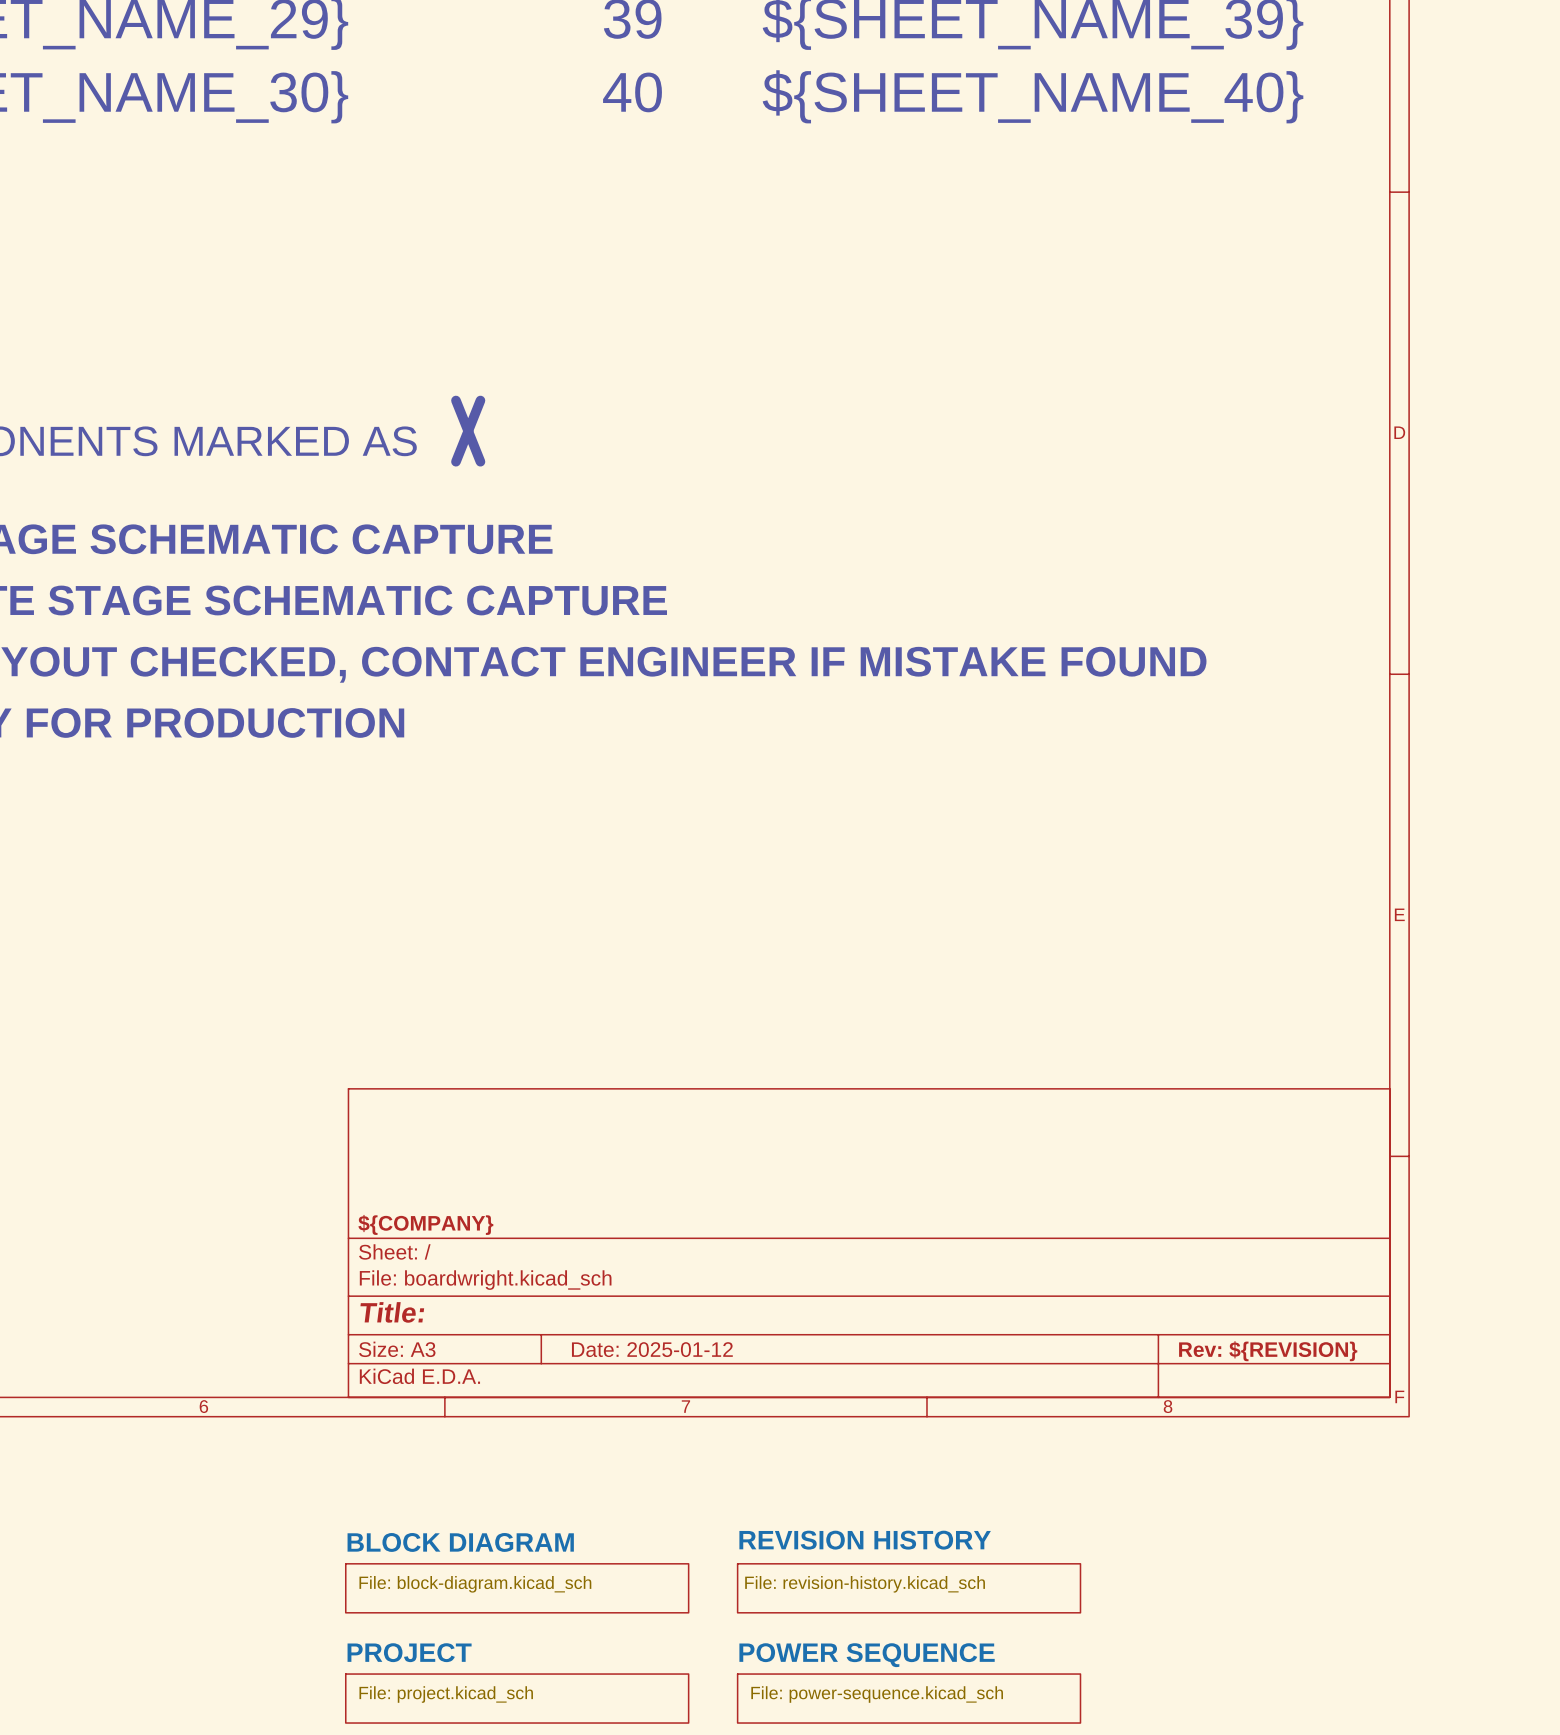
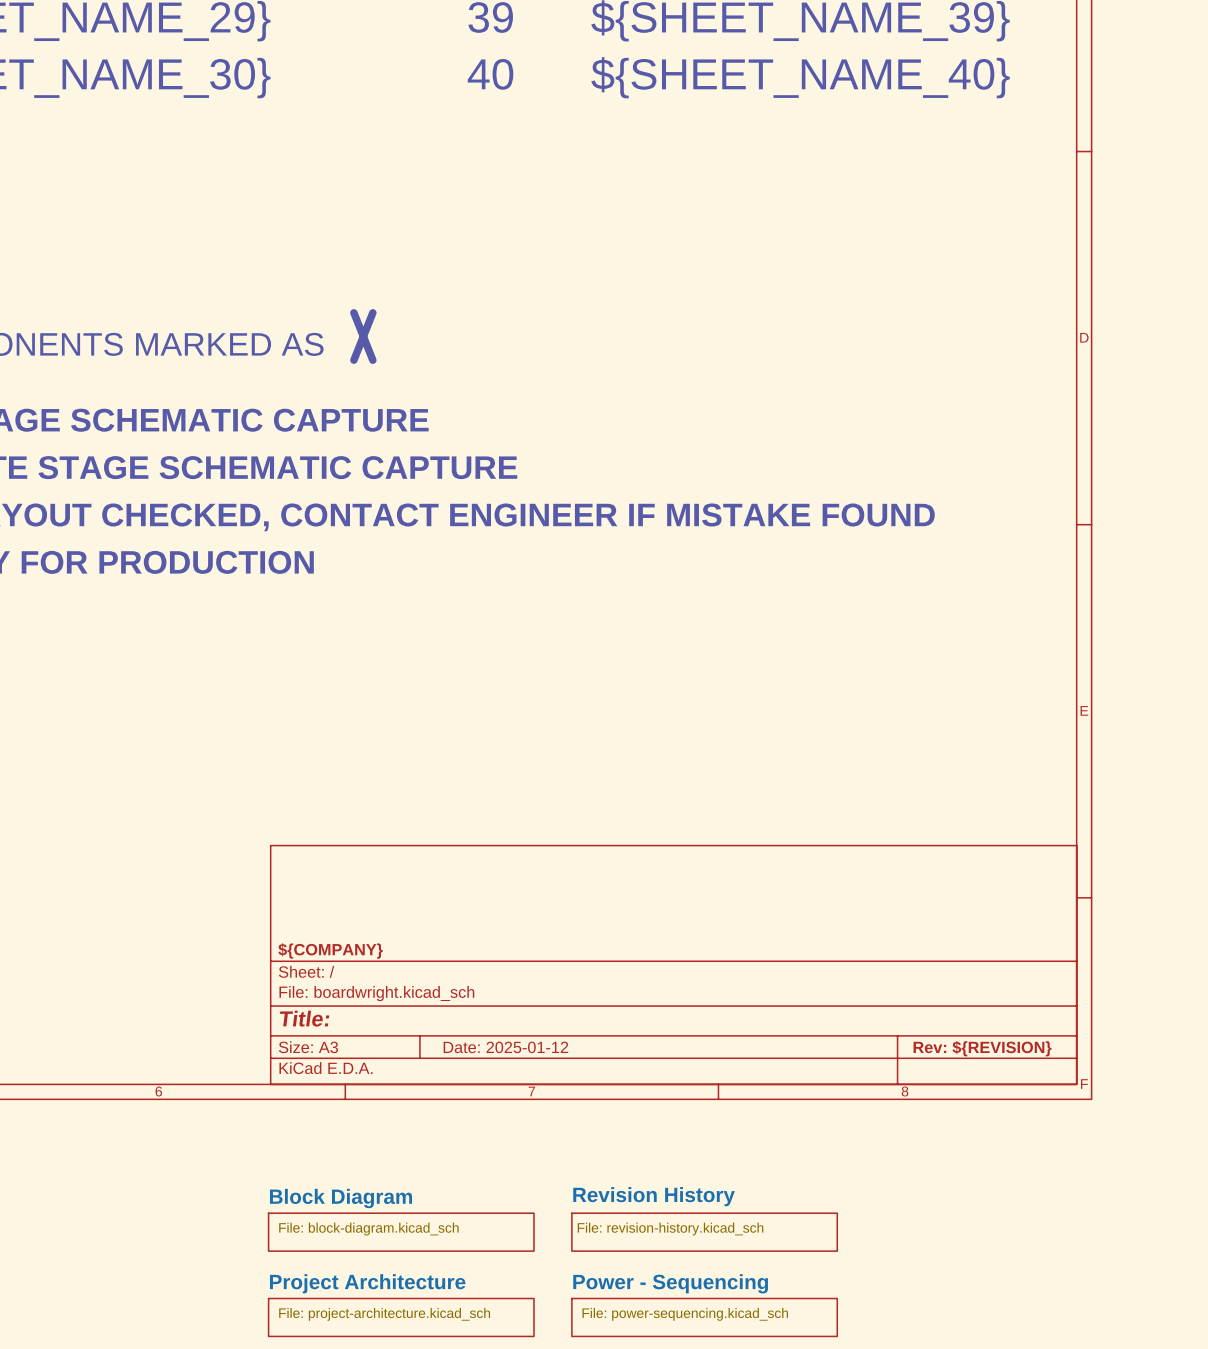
sheet REVISION HISTORY name: REVISION HISTORY (865, 1540) -> Revision History (654, 1196)
sheet BLOCK DIAGRAM name: BLOCK DIAGRAM (460, 1542) -> Block Diagram (340, 1198)
sheet PROJECT name: PROJECT (409, 1652) -> Project Architecture (367, 1283)
sheet POWER SEQUENCE name: POWER SEQUENCE (867, 1655) -> Power - Sequencing (670, 1283)
sheet PROJECT value: File: project.kicad_sch (446, 1694) -> File: project-architecture.kicad_sch (384, 1314)
sheet POWER SEQUENCE value: File: power-sequence.kicad_sch (877, 1694) -> File: power-sequencing.kicad_sch (685, 1314)

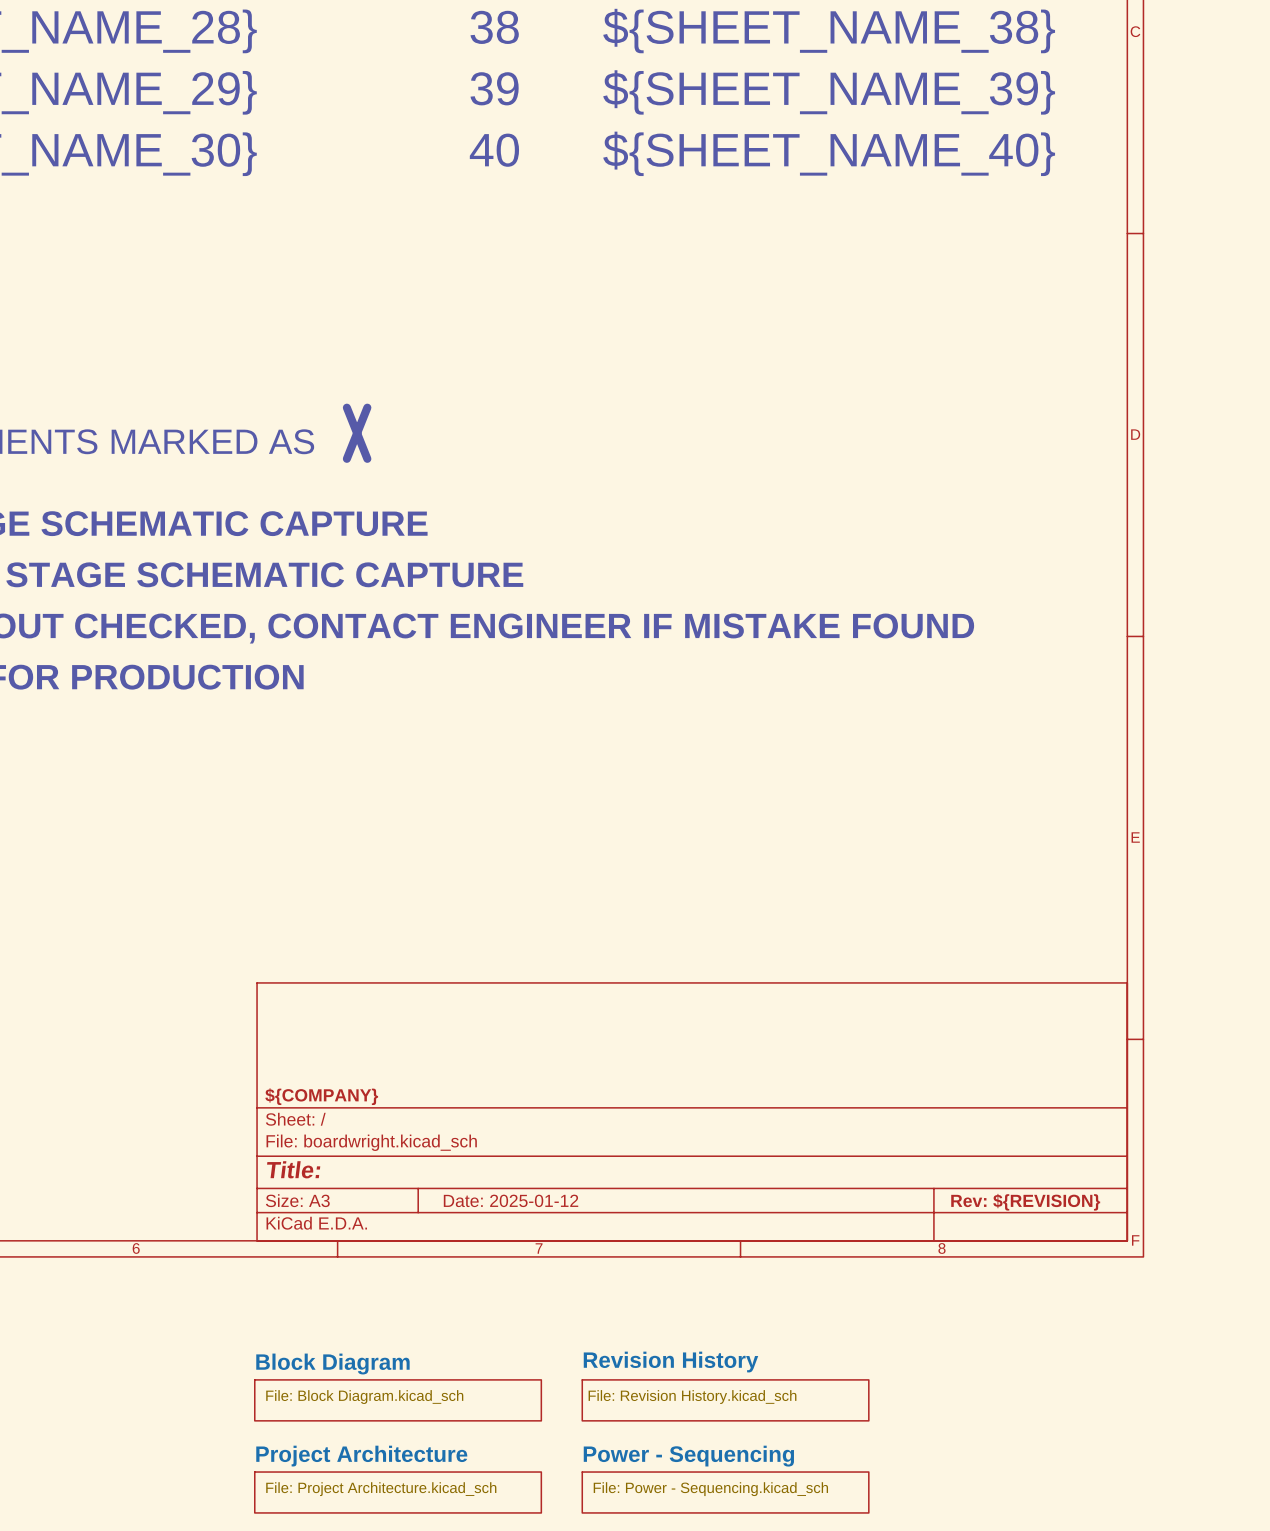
sheet Block Diagram value: File: block-diagram.kicad_sch (368, 1229) -> File: Block Diagram.kicad_sch (364, 1397)
sheet Revision History value: File: revision-history.kicad_sch (670, 1229) -> File: Revision History.kicad_sch (692, 1397)
sheet Project Architecture value: File: project-architecture.kicad_sch (384, 1314) -> File: Project Architecture.kicad_sch (381, 1489)
sheet Power - Sequencing value: File: power-sequencing.kicad_sch (685, 1314) -> File: Power - Sequencing.kicad_sch (710, 1489)

